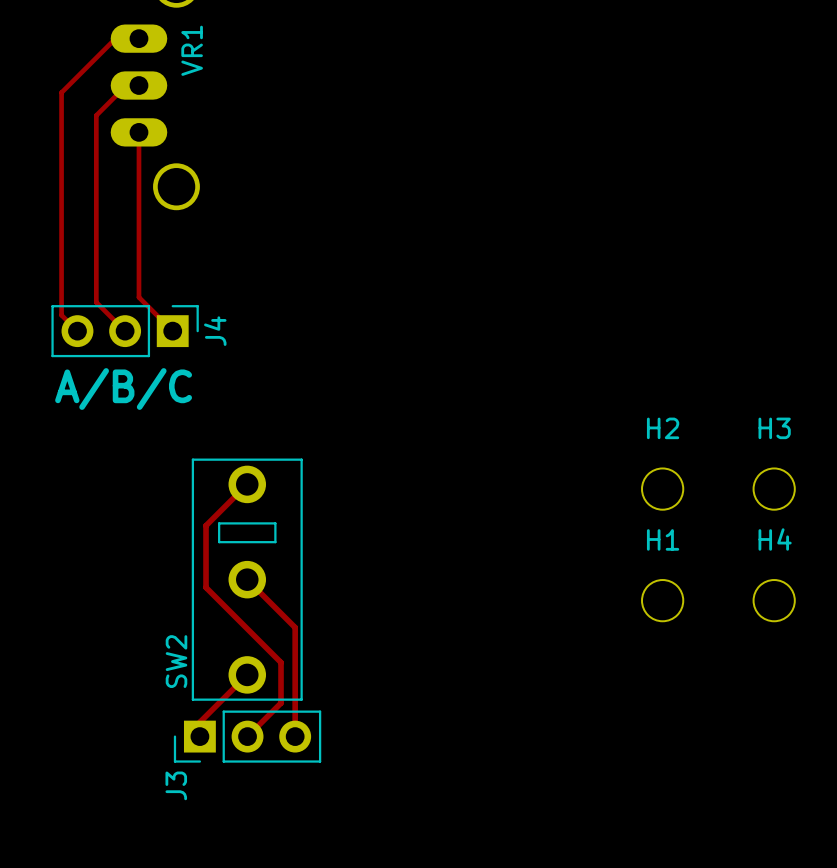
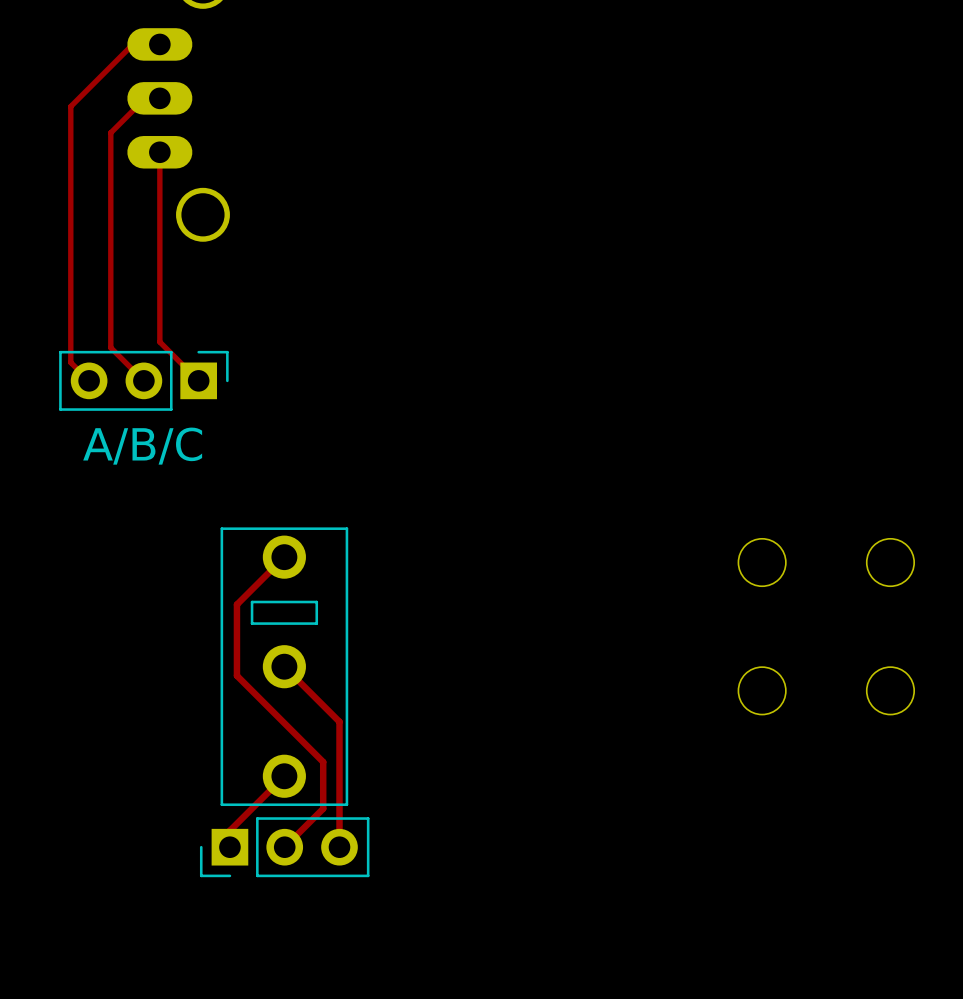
VR1 name: VR1 (192, 50) -> none
J4 name: J4 (215, 331) -> none
H2 name: H2 (663, 428) -> none
H3 name: H3 (774, 428) -> none
H1 name: H1 (663, 539) -> none
H4 name: H4 (775, 539) -> none
SW2 name: SW2 (176, 661) -> none
J3 name: J3 (176, 785) -> none

